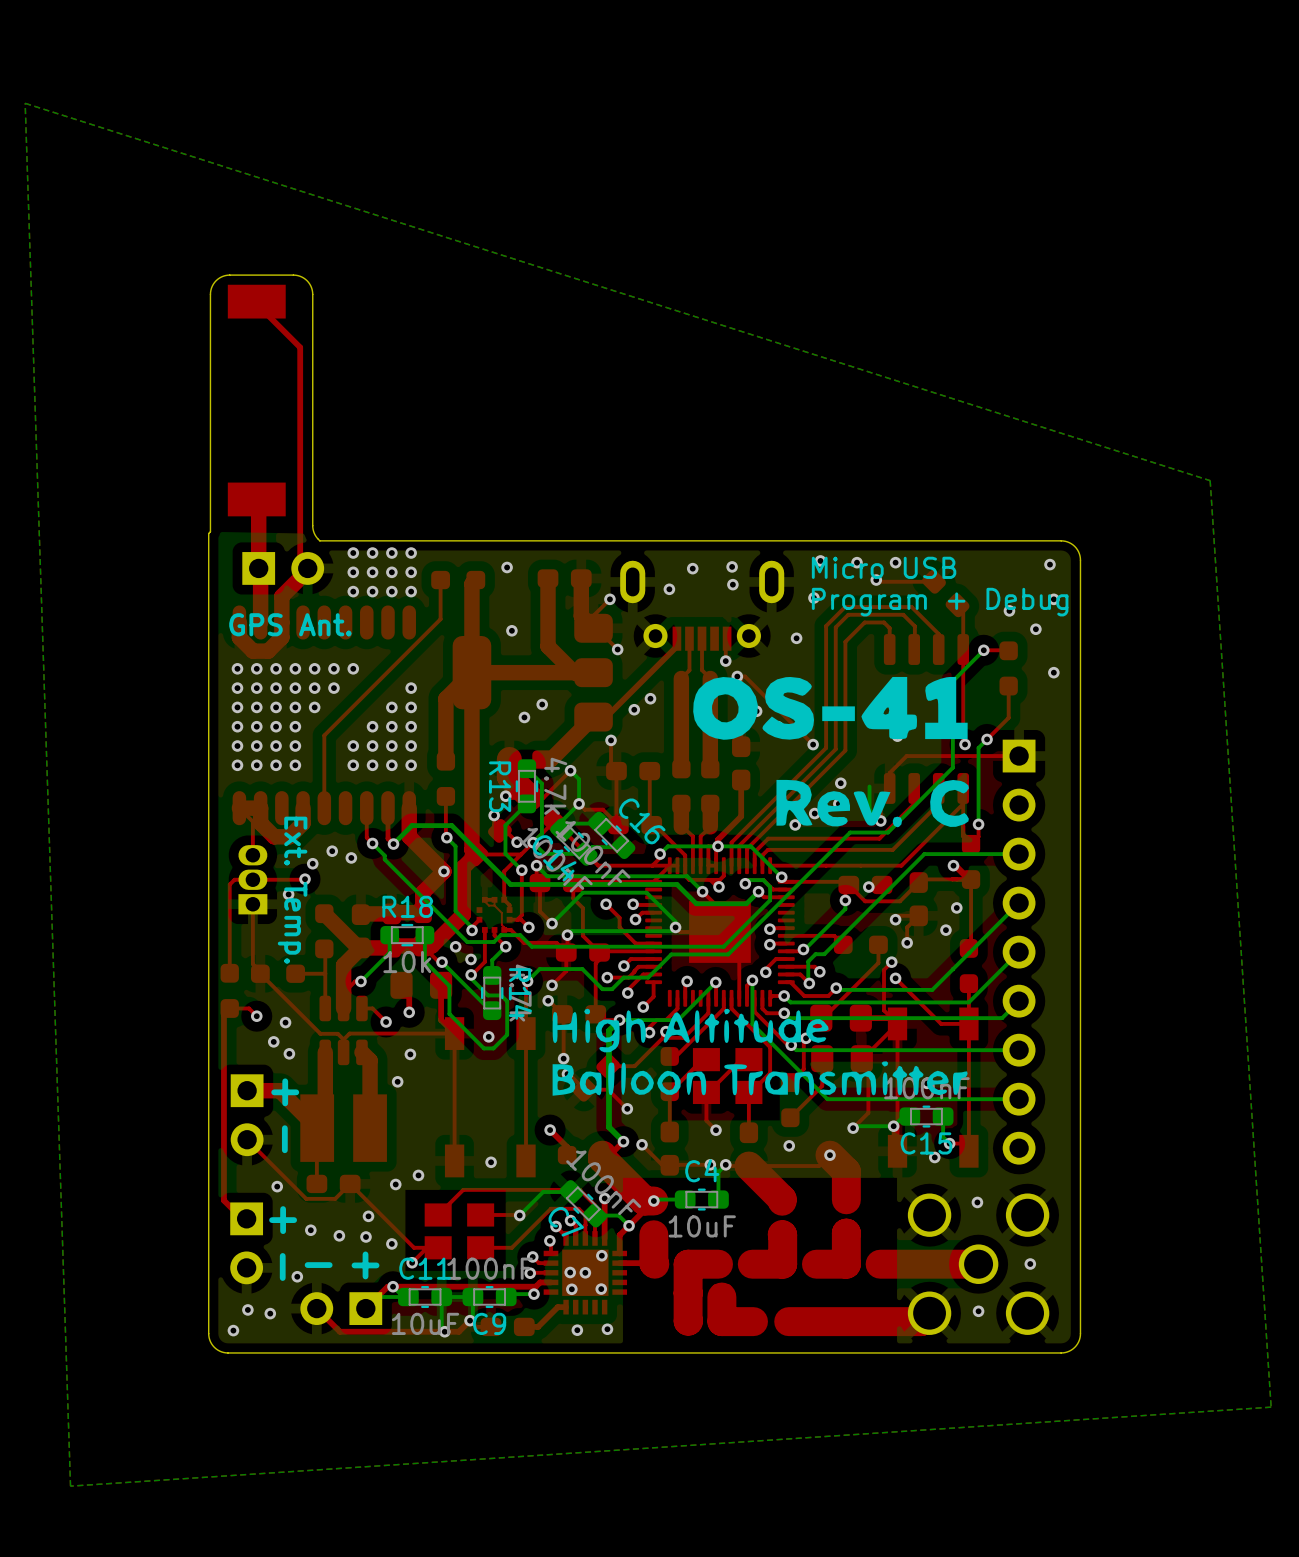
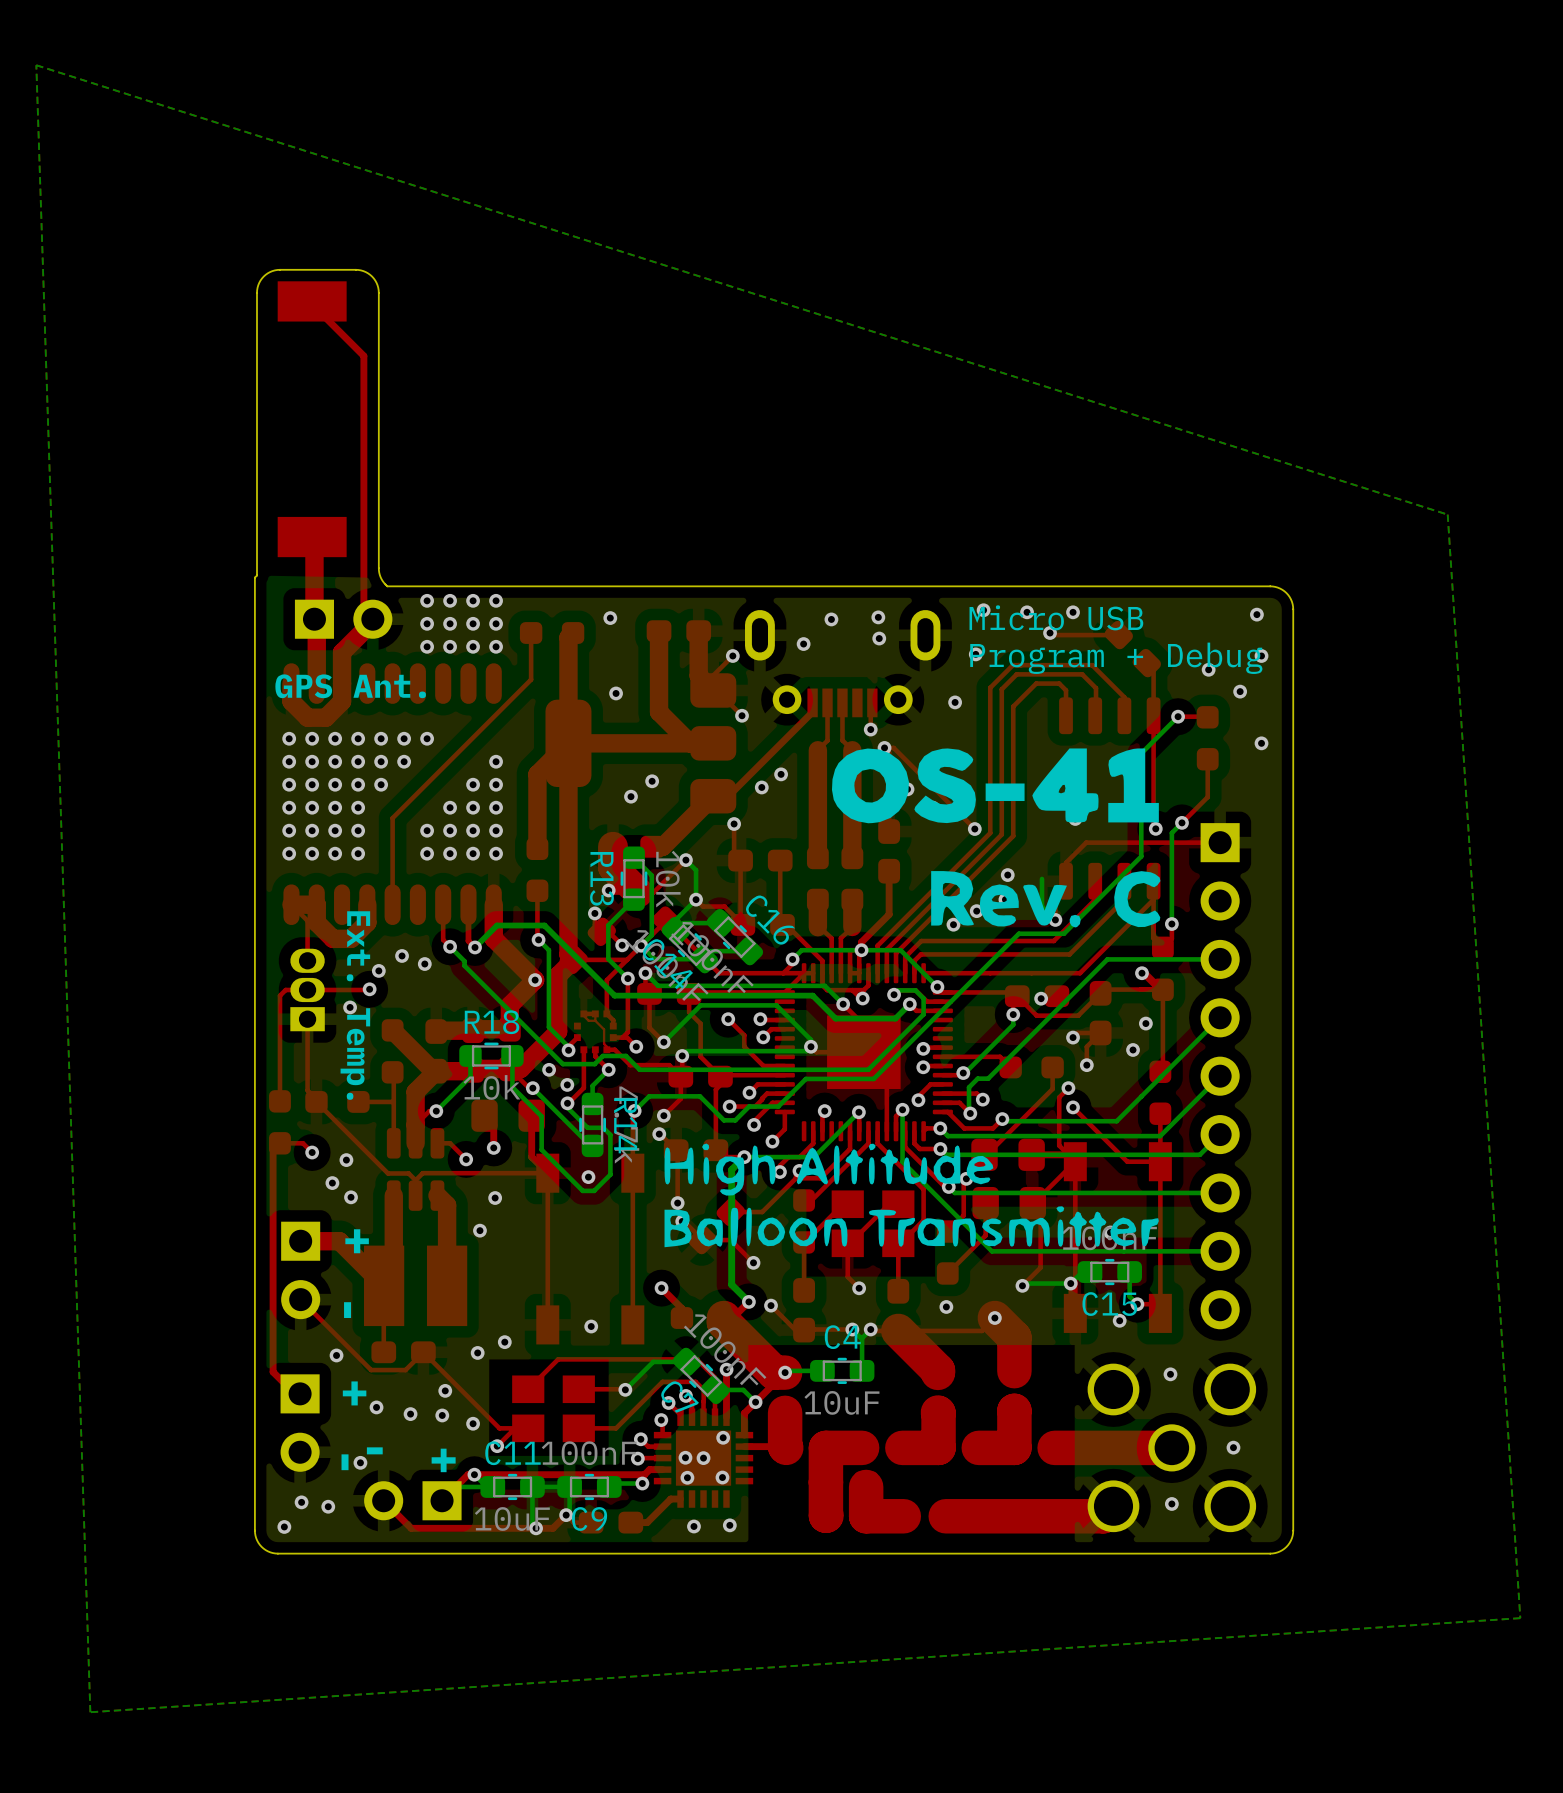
R13 value: 4.7k (555, 786) -> 10k (668, 879)

